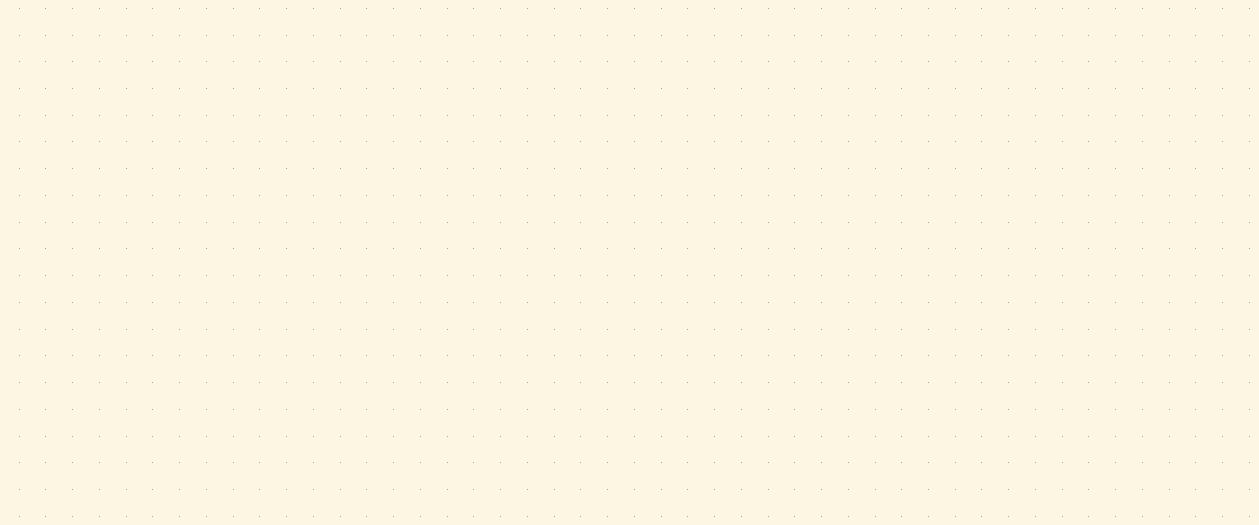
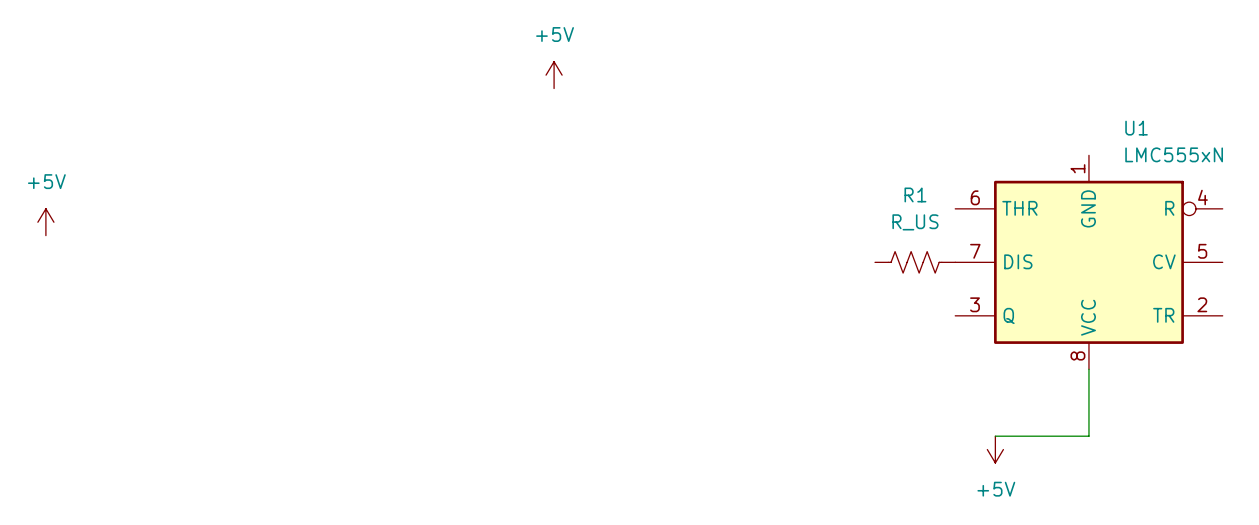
power symbol: none -> +5V (554, 75)
power symbol: none -> +5V (45, 222)
R1: none -> R_US (915, 262)
U1: none -> LMC555xN (1088, 262)
wire: none -> (1088, 369) (1088, 436) (995, 436)
power symbol: none -> +5V (995, 449)

